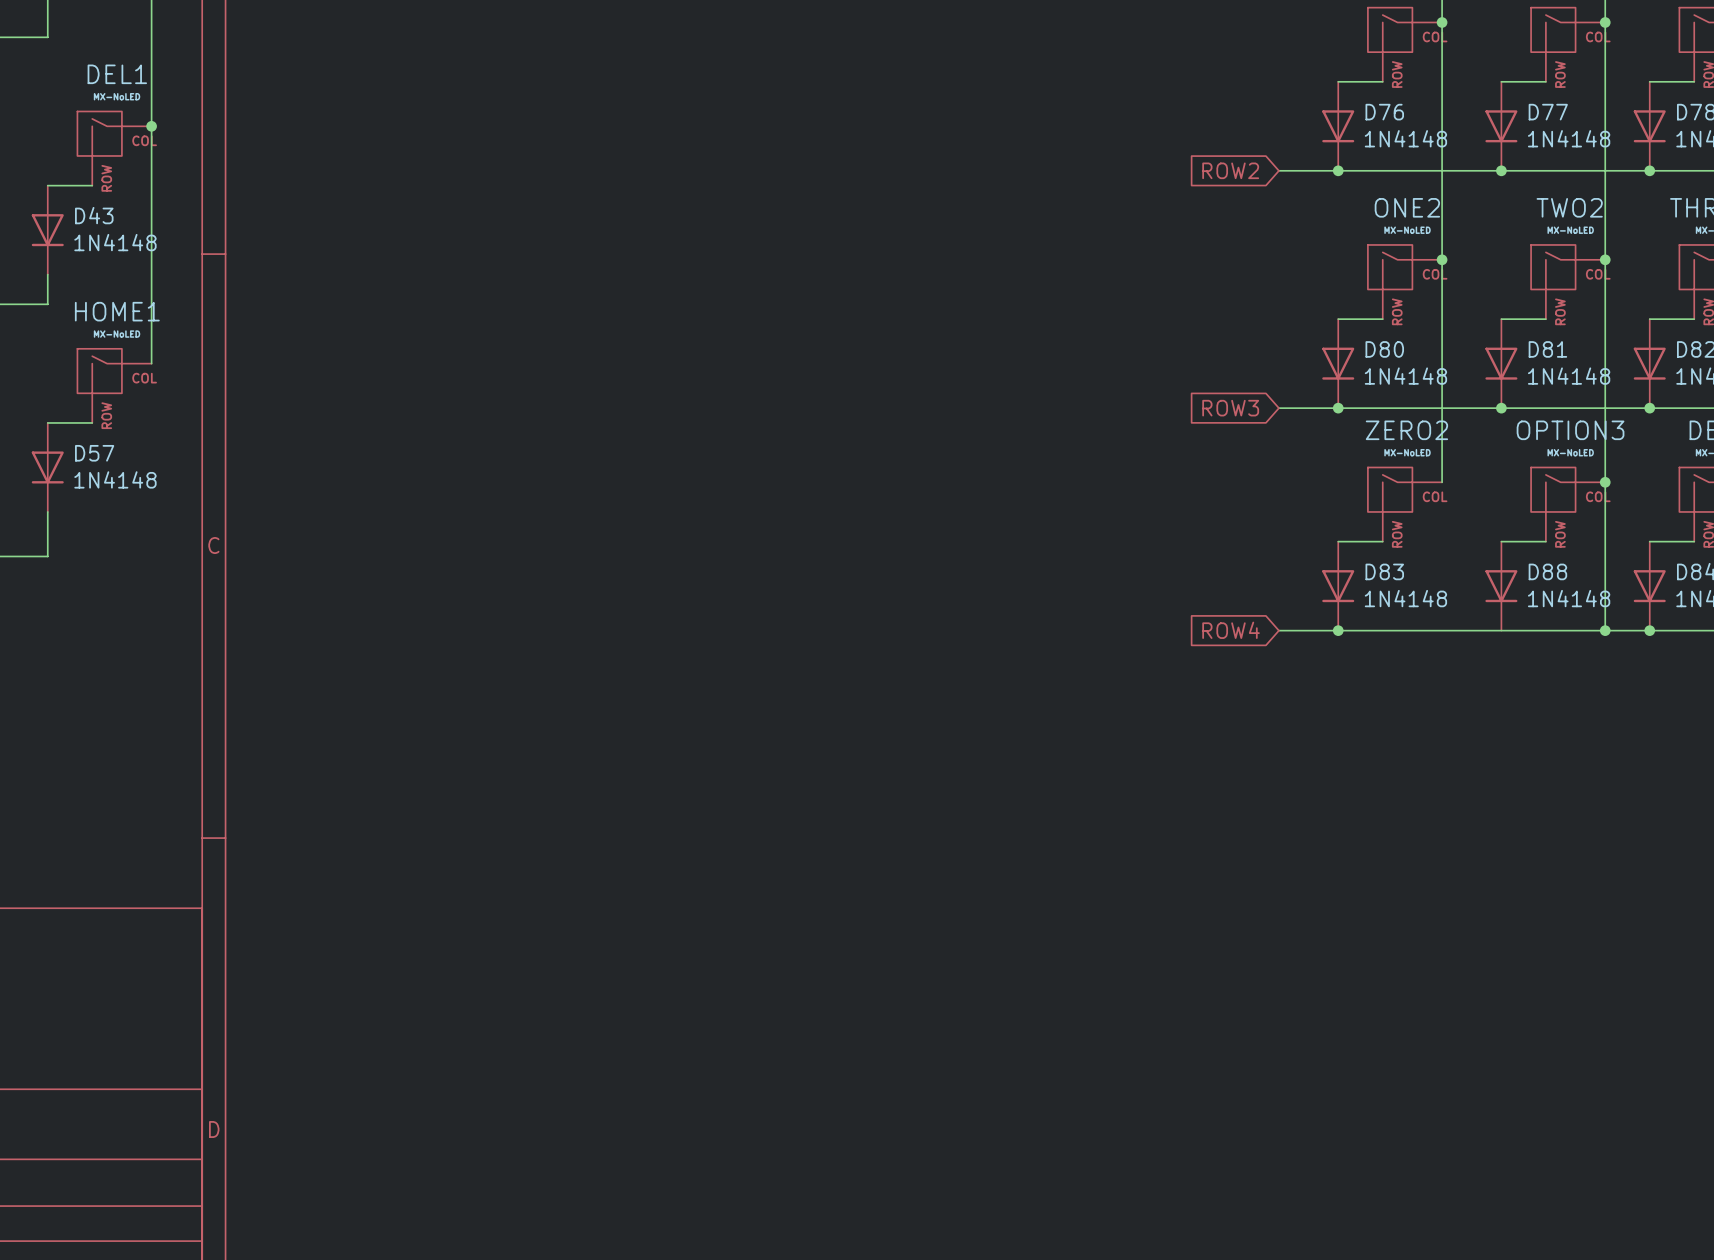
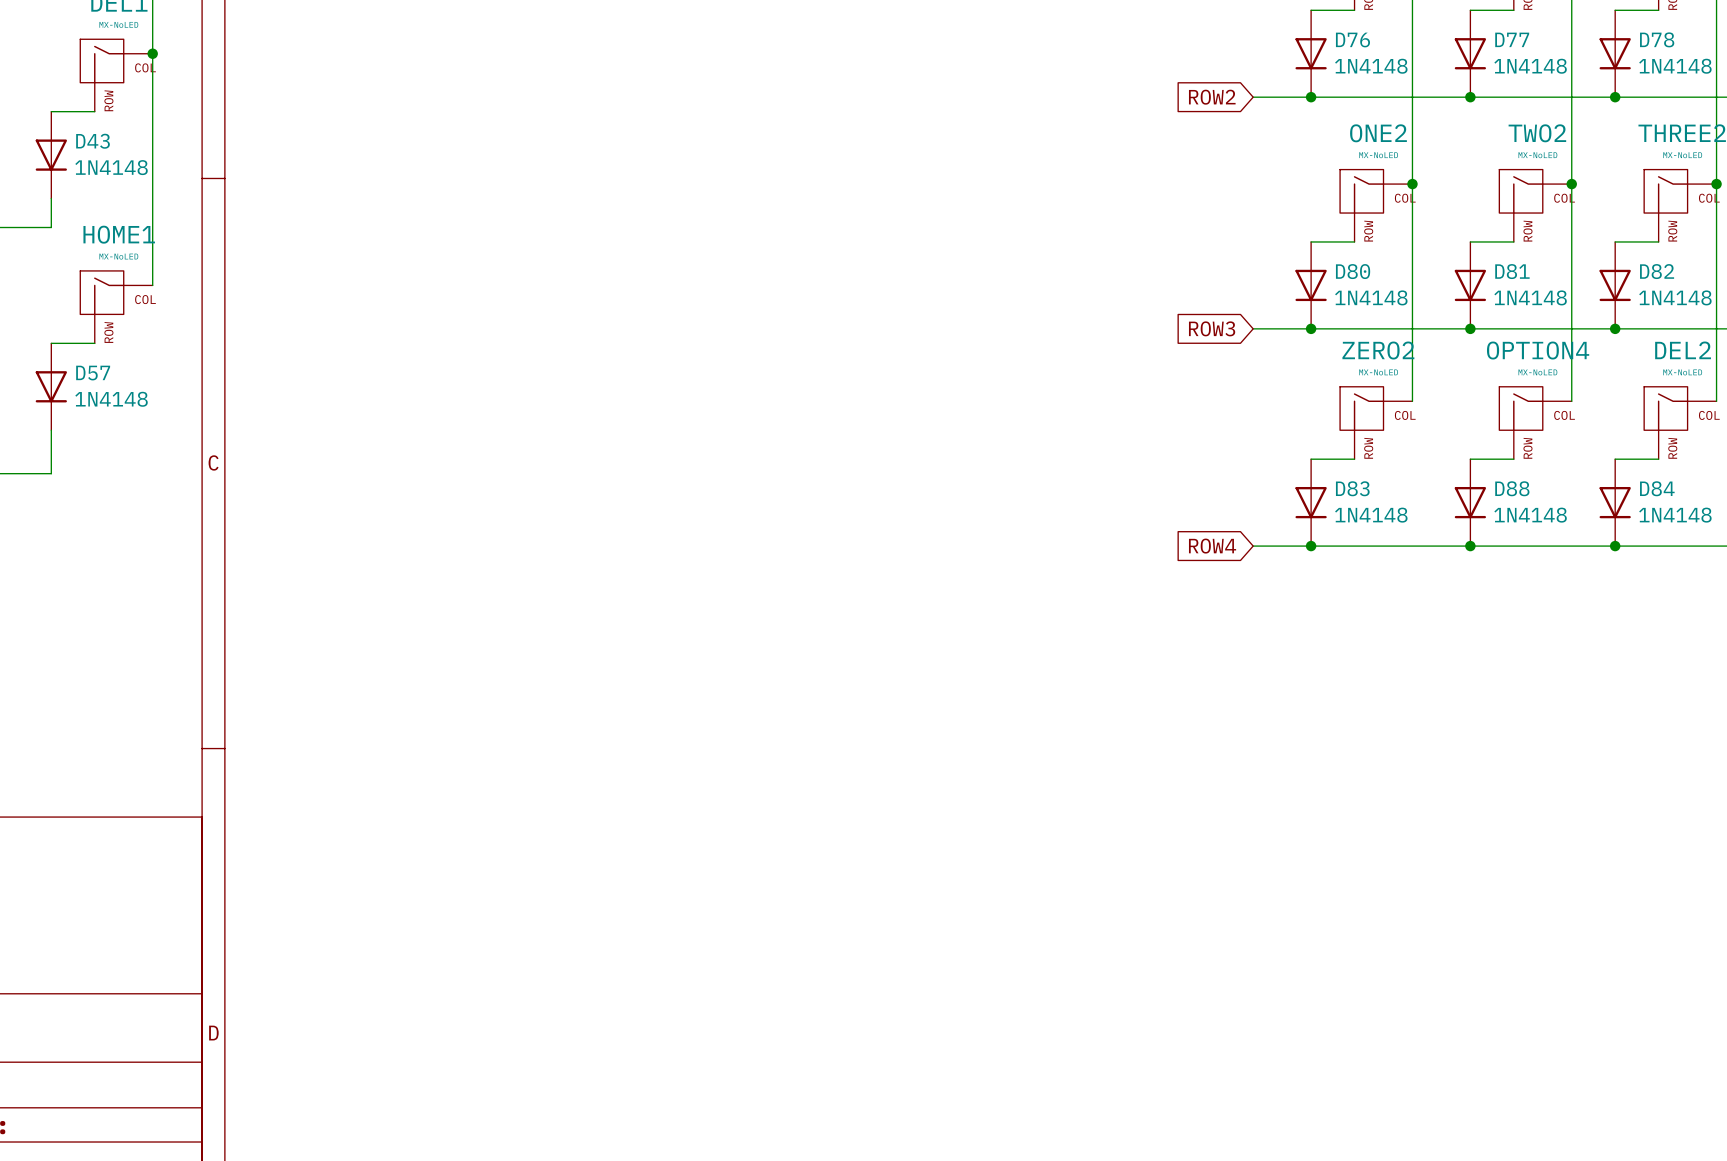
OPTION3 name: OPTION3 (1570, 430) -> OPTION4 (1538, 350)
wire: (1605, 482) (1605, 630) -> none
junction: (1605, 482) -> none
junction: none -> (1470, 546)
junction: (1605, 630) -> none

